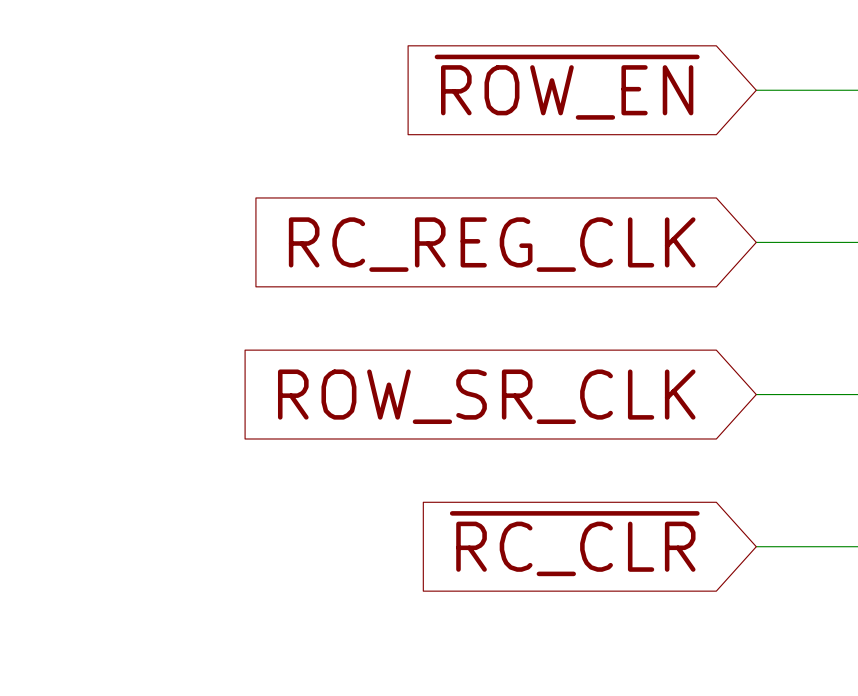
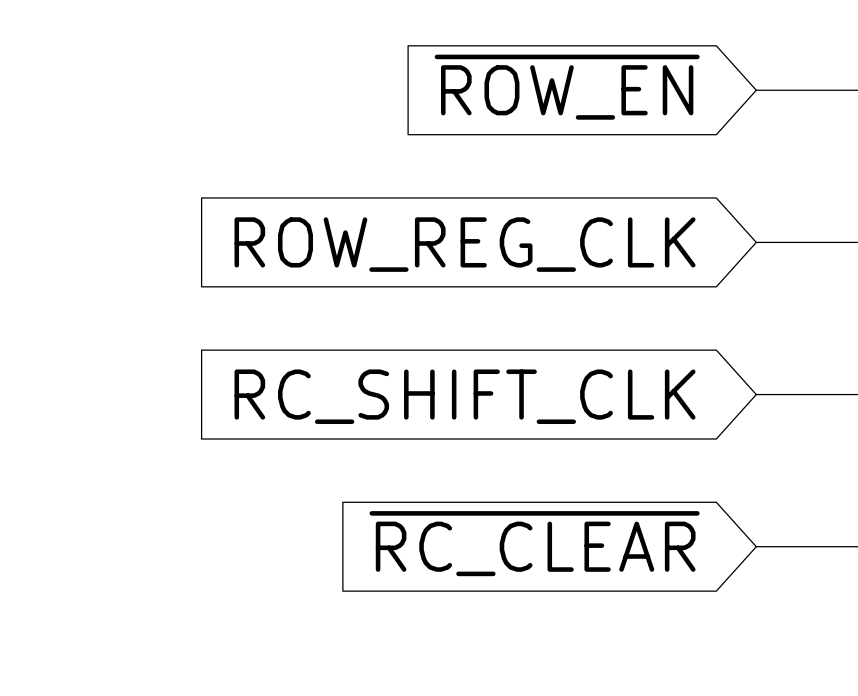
global label: RC_REG_CLK (492, 244) -> ROW_REG_CLK (465, 244)
global label: ROW_SR_CLK (486, 396) -> RC_SHIFT_CLK (465, 396)
global label: ~{RC_CLR} (574, 543) -> ~{RC_CLEAR} (534, 543)

